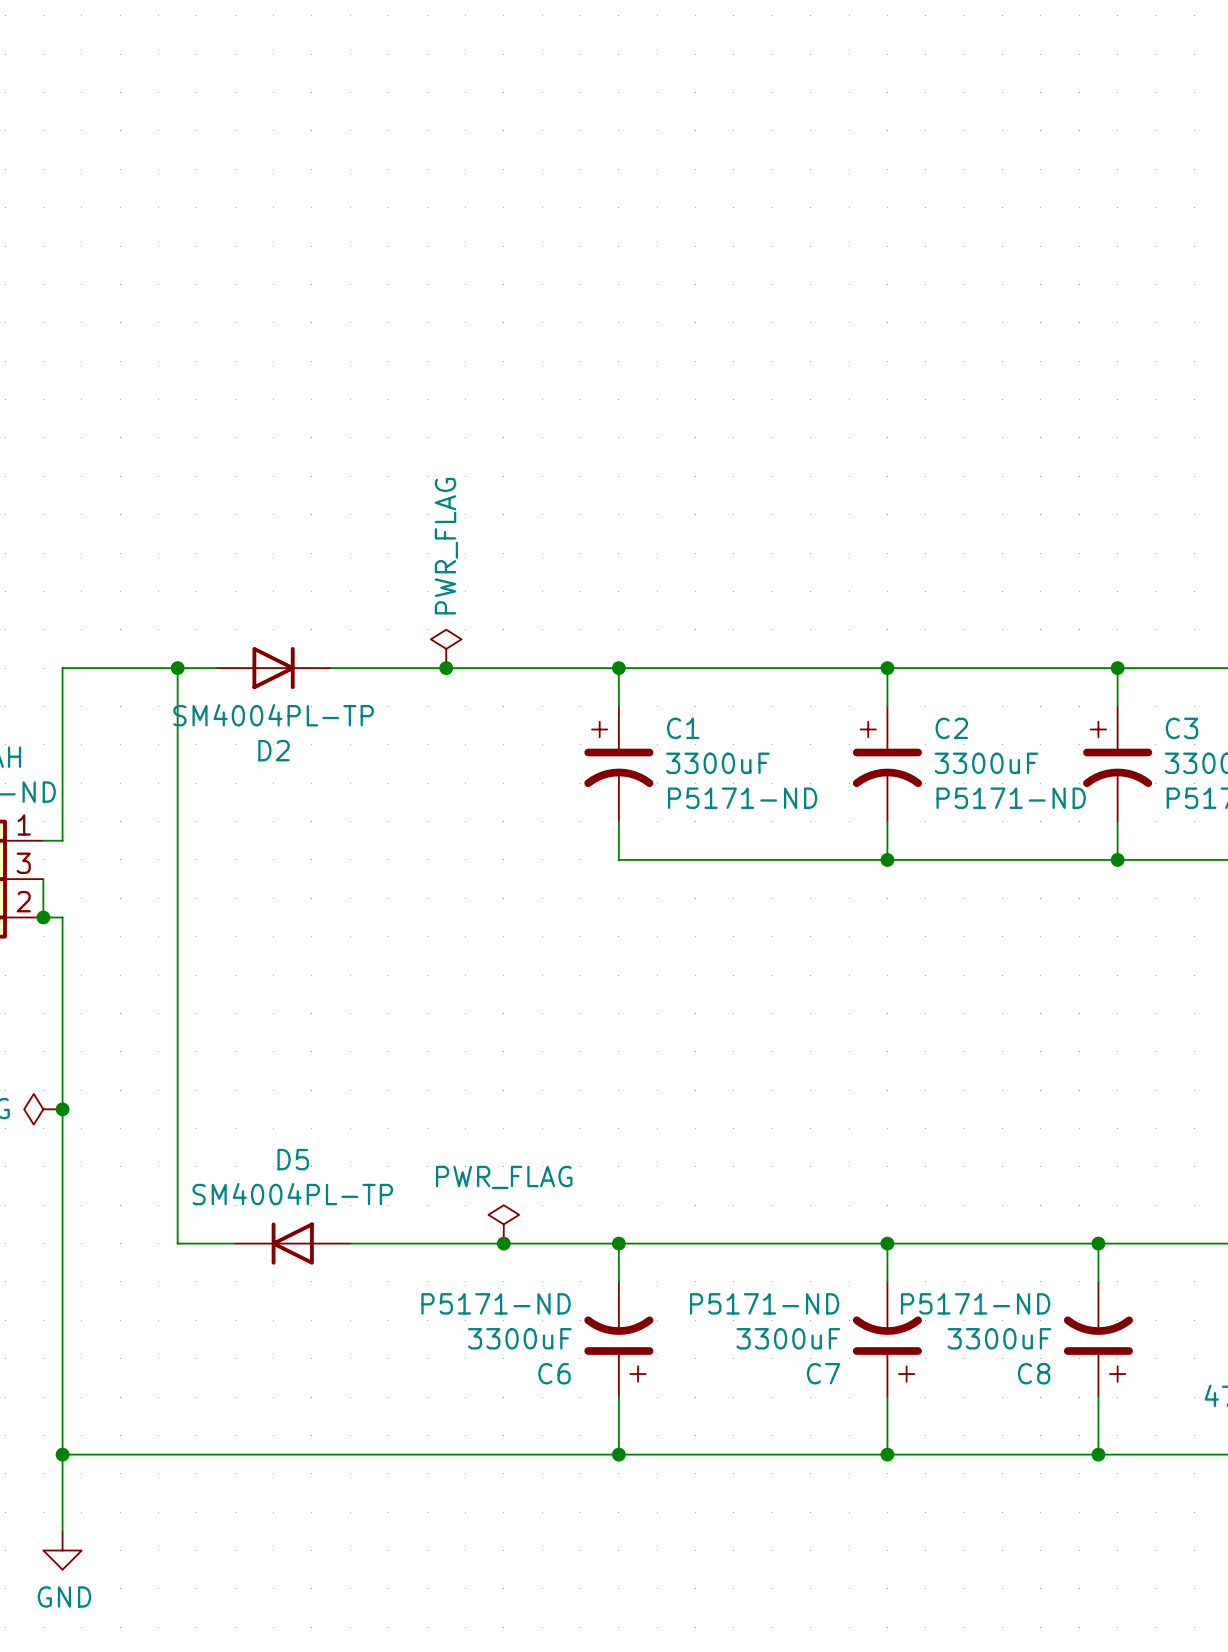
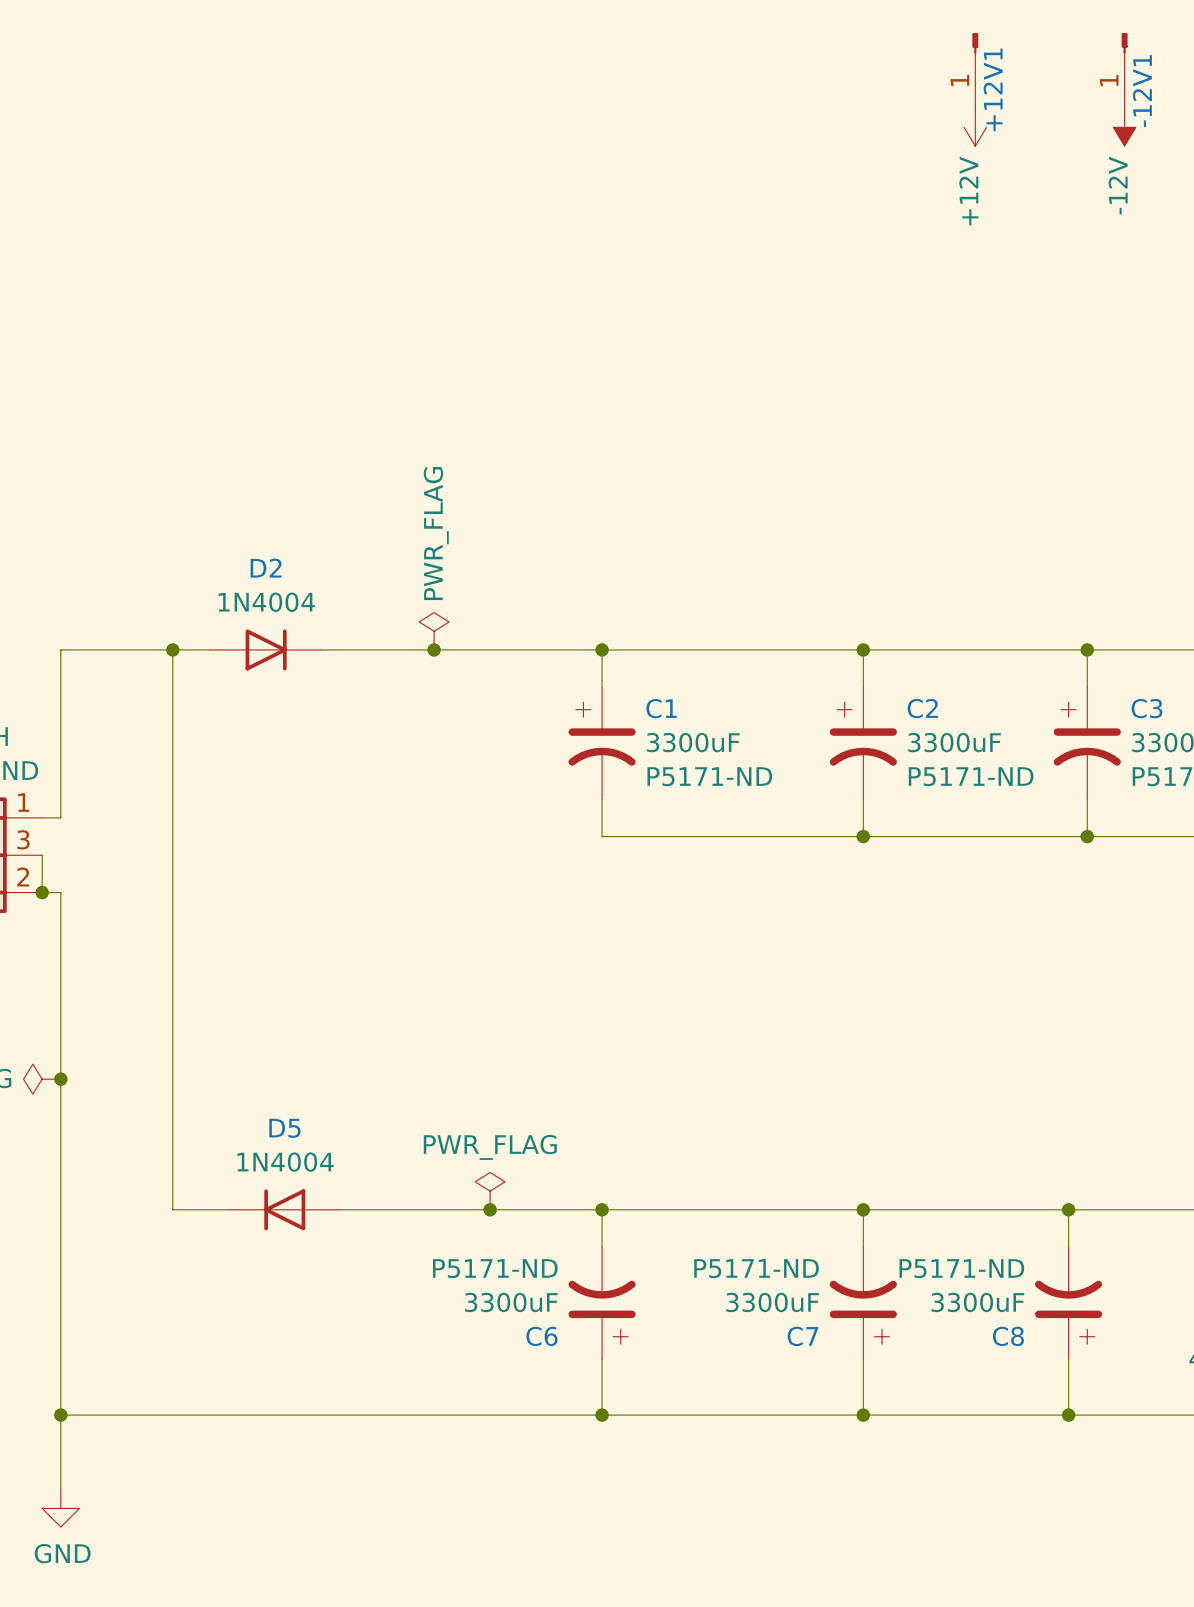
+12V1: none -> (975, 70)
-12V1: none -> (1124, 70)
power symbol: none -> +12V (975, 127)
power symbol: none -> -12V (1124, 127)
D2 value: SM4004PL-TP (273, 715) -> 1N4004 (266, 602)
D2 name position: D2 (274, 750) -> D2 (266, 568)
D5 value: SM4004PL-TP (292, 1194) -> 1N4004 (285, 1162)

